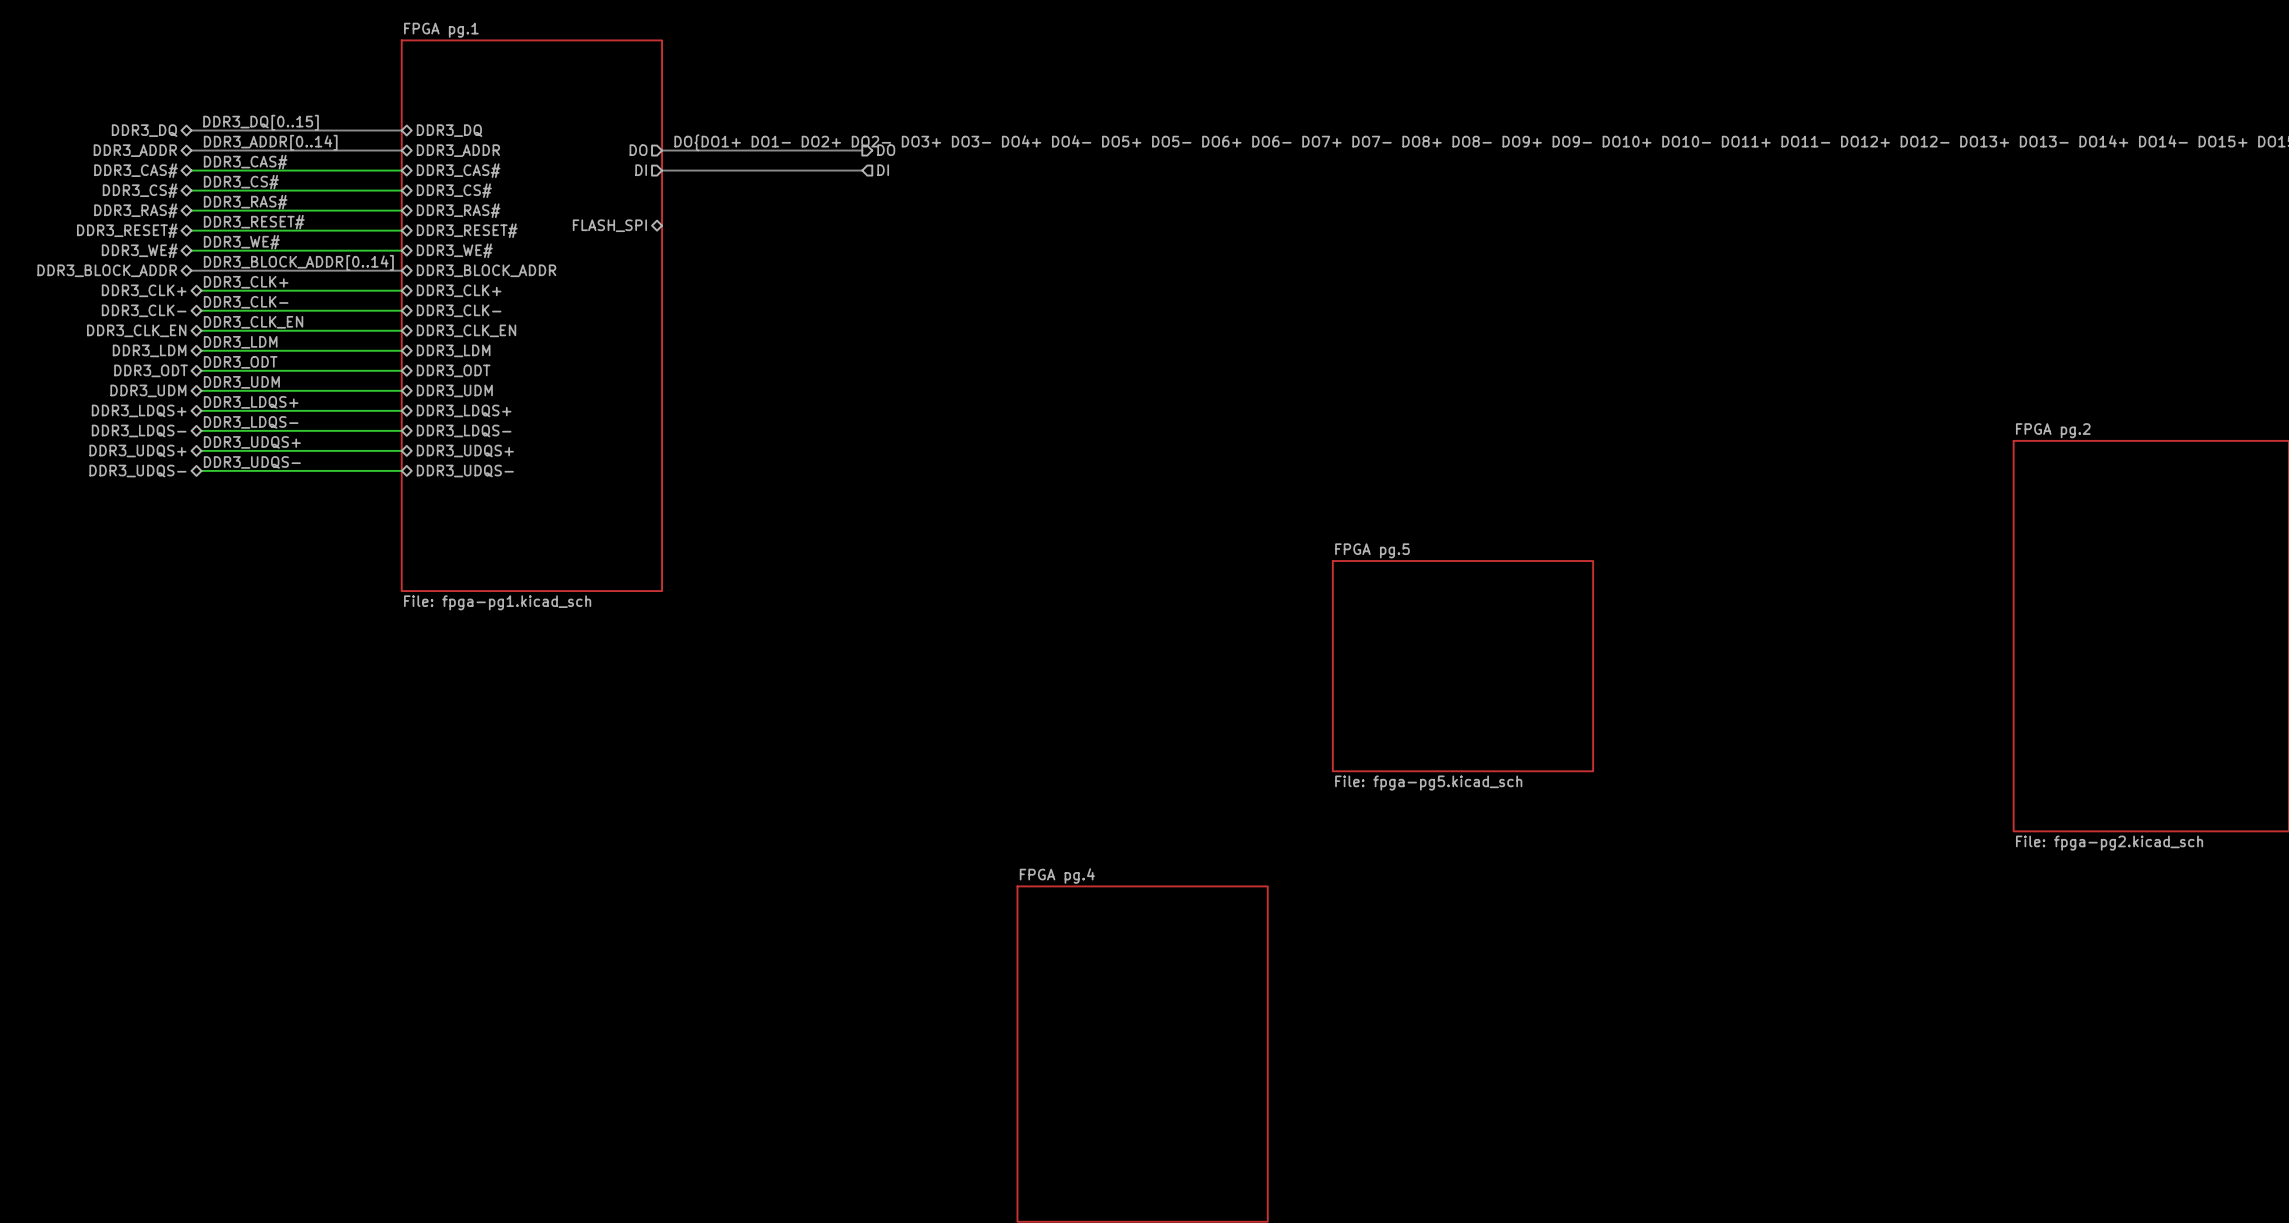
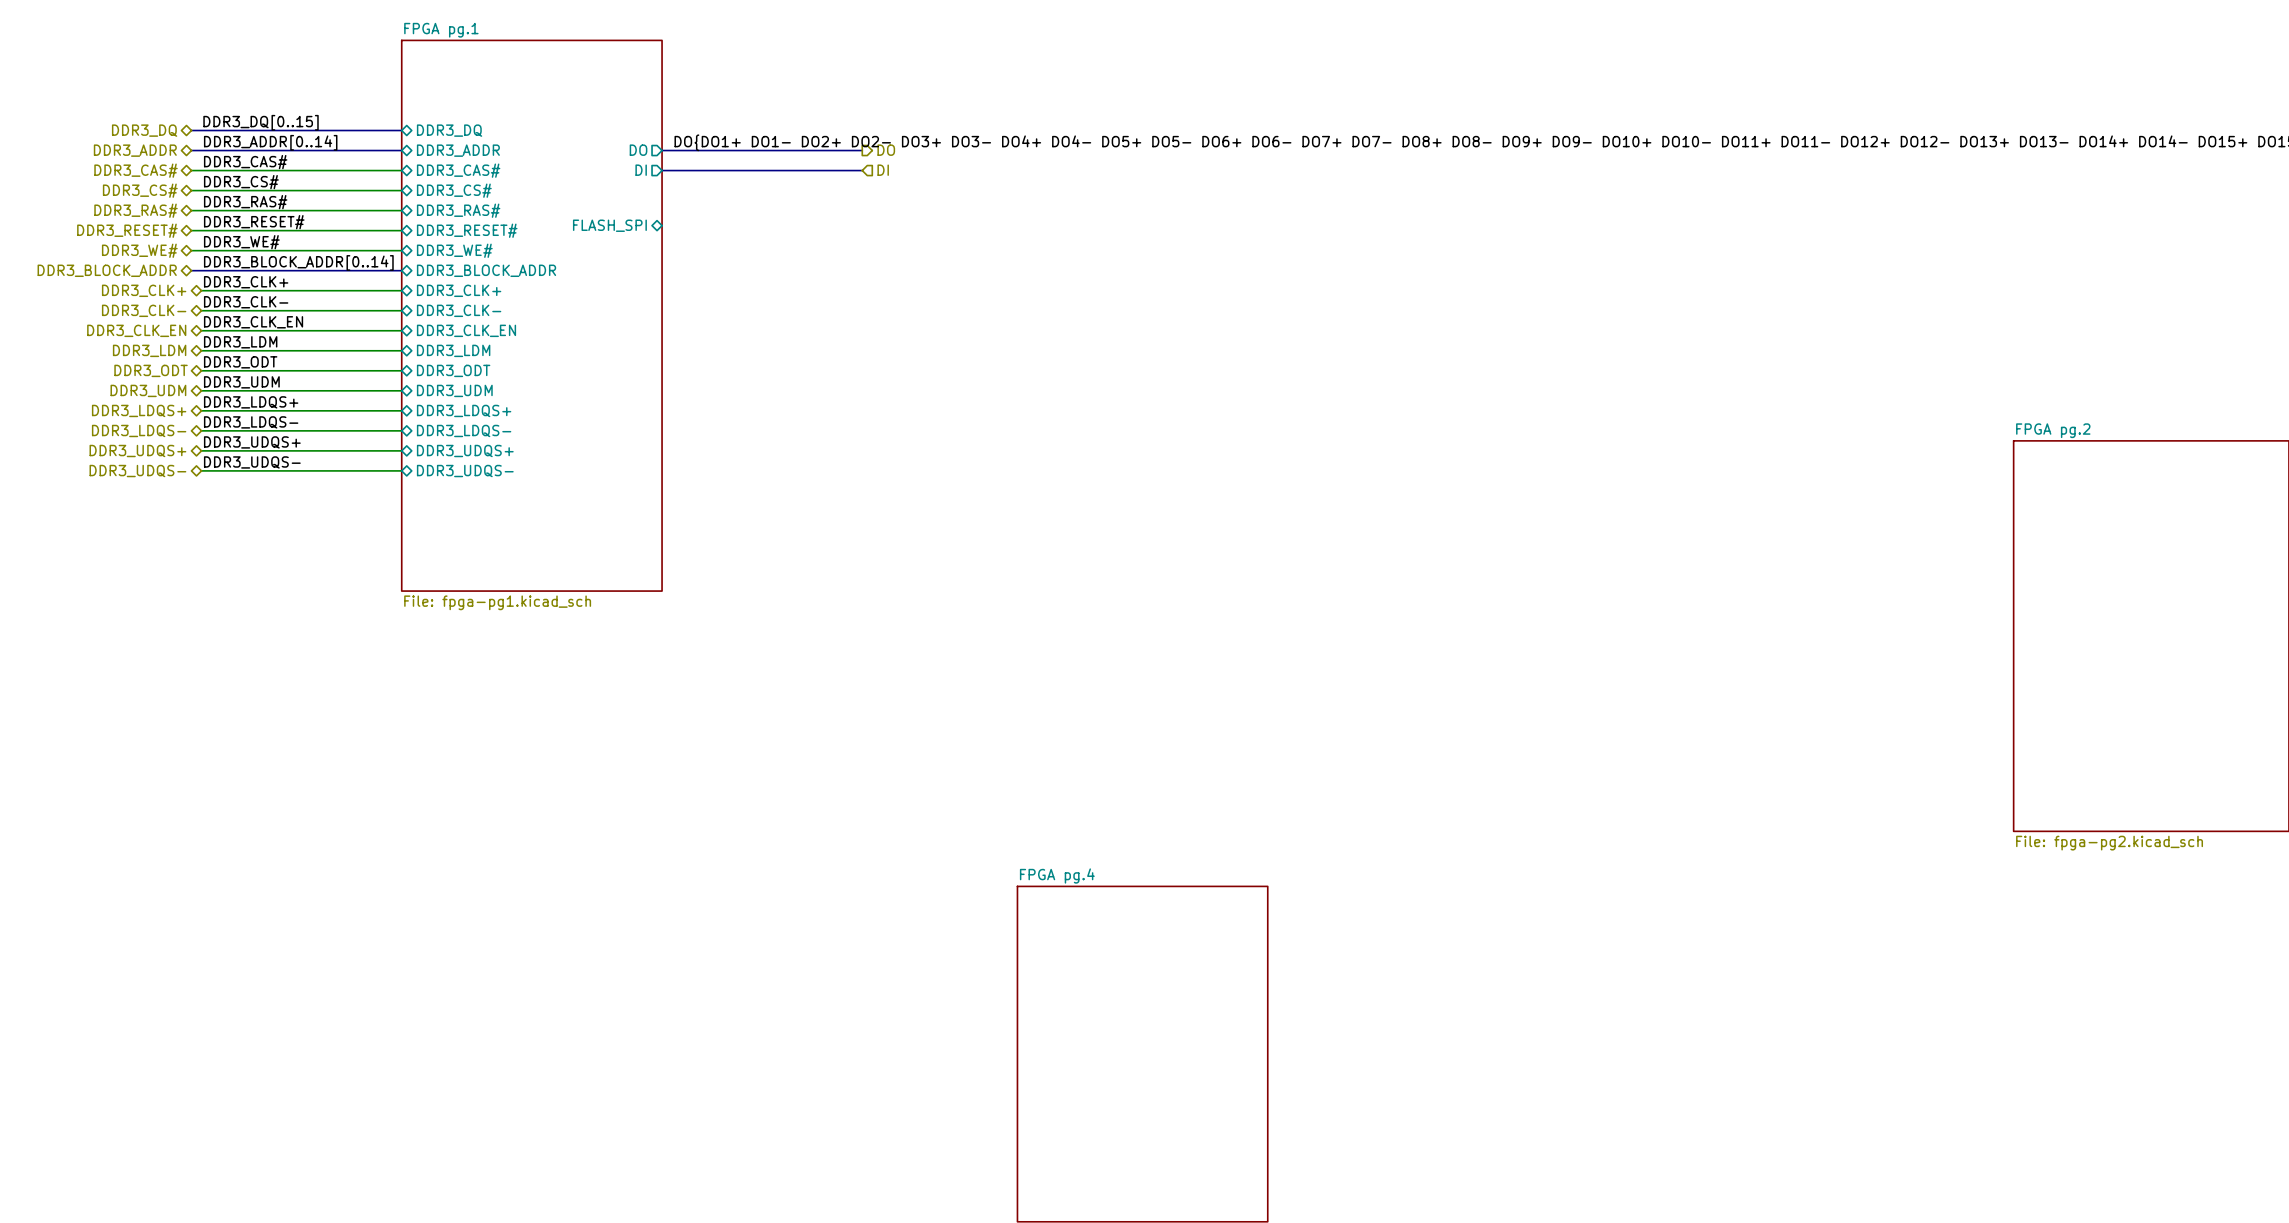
sheet FPGA pg.5: File: fpga-pg5.kicad_sch (1462, 666) -> none

